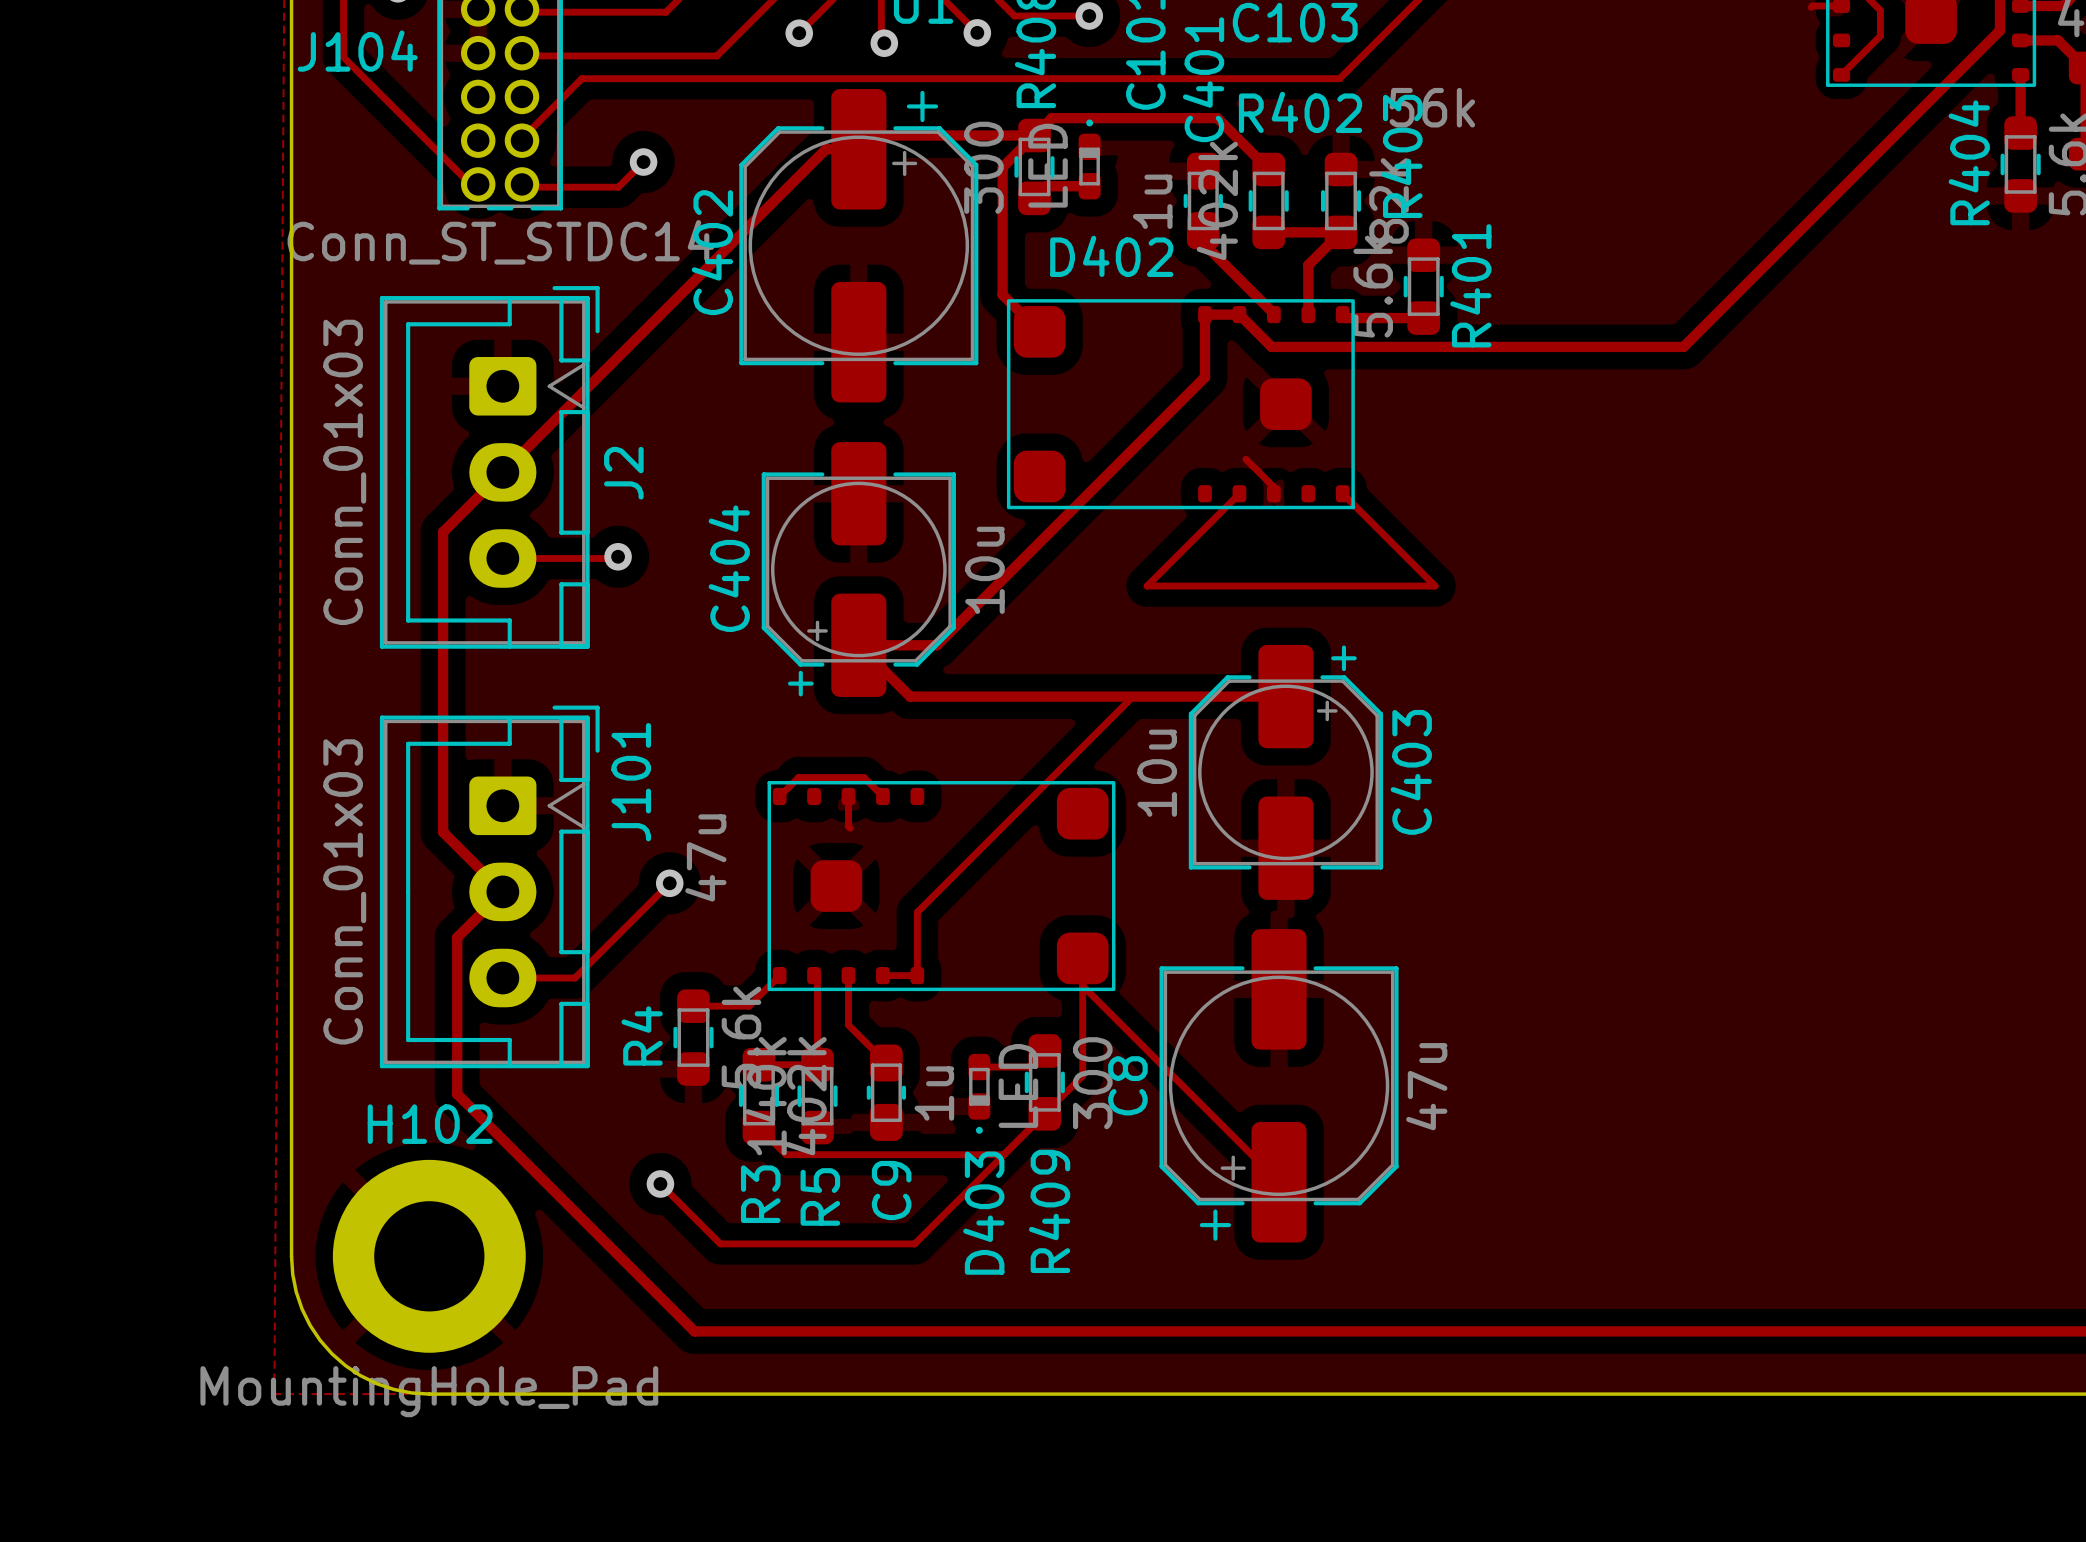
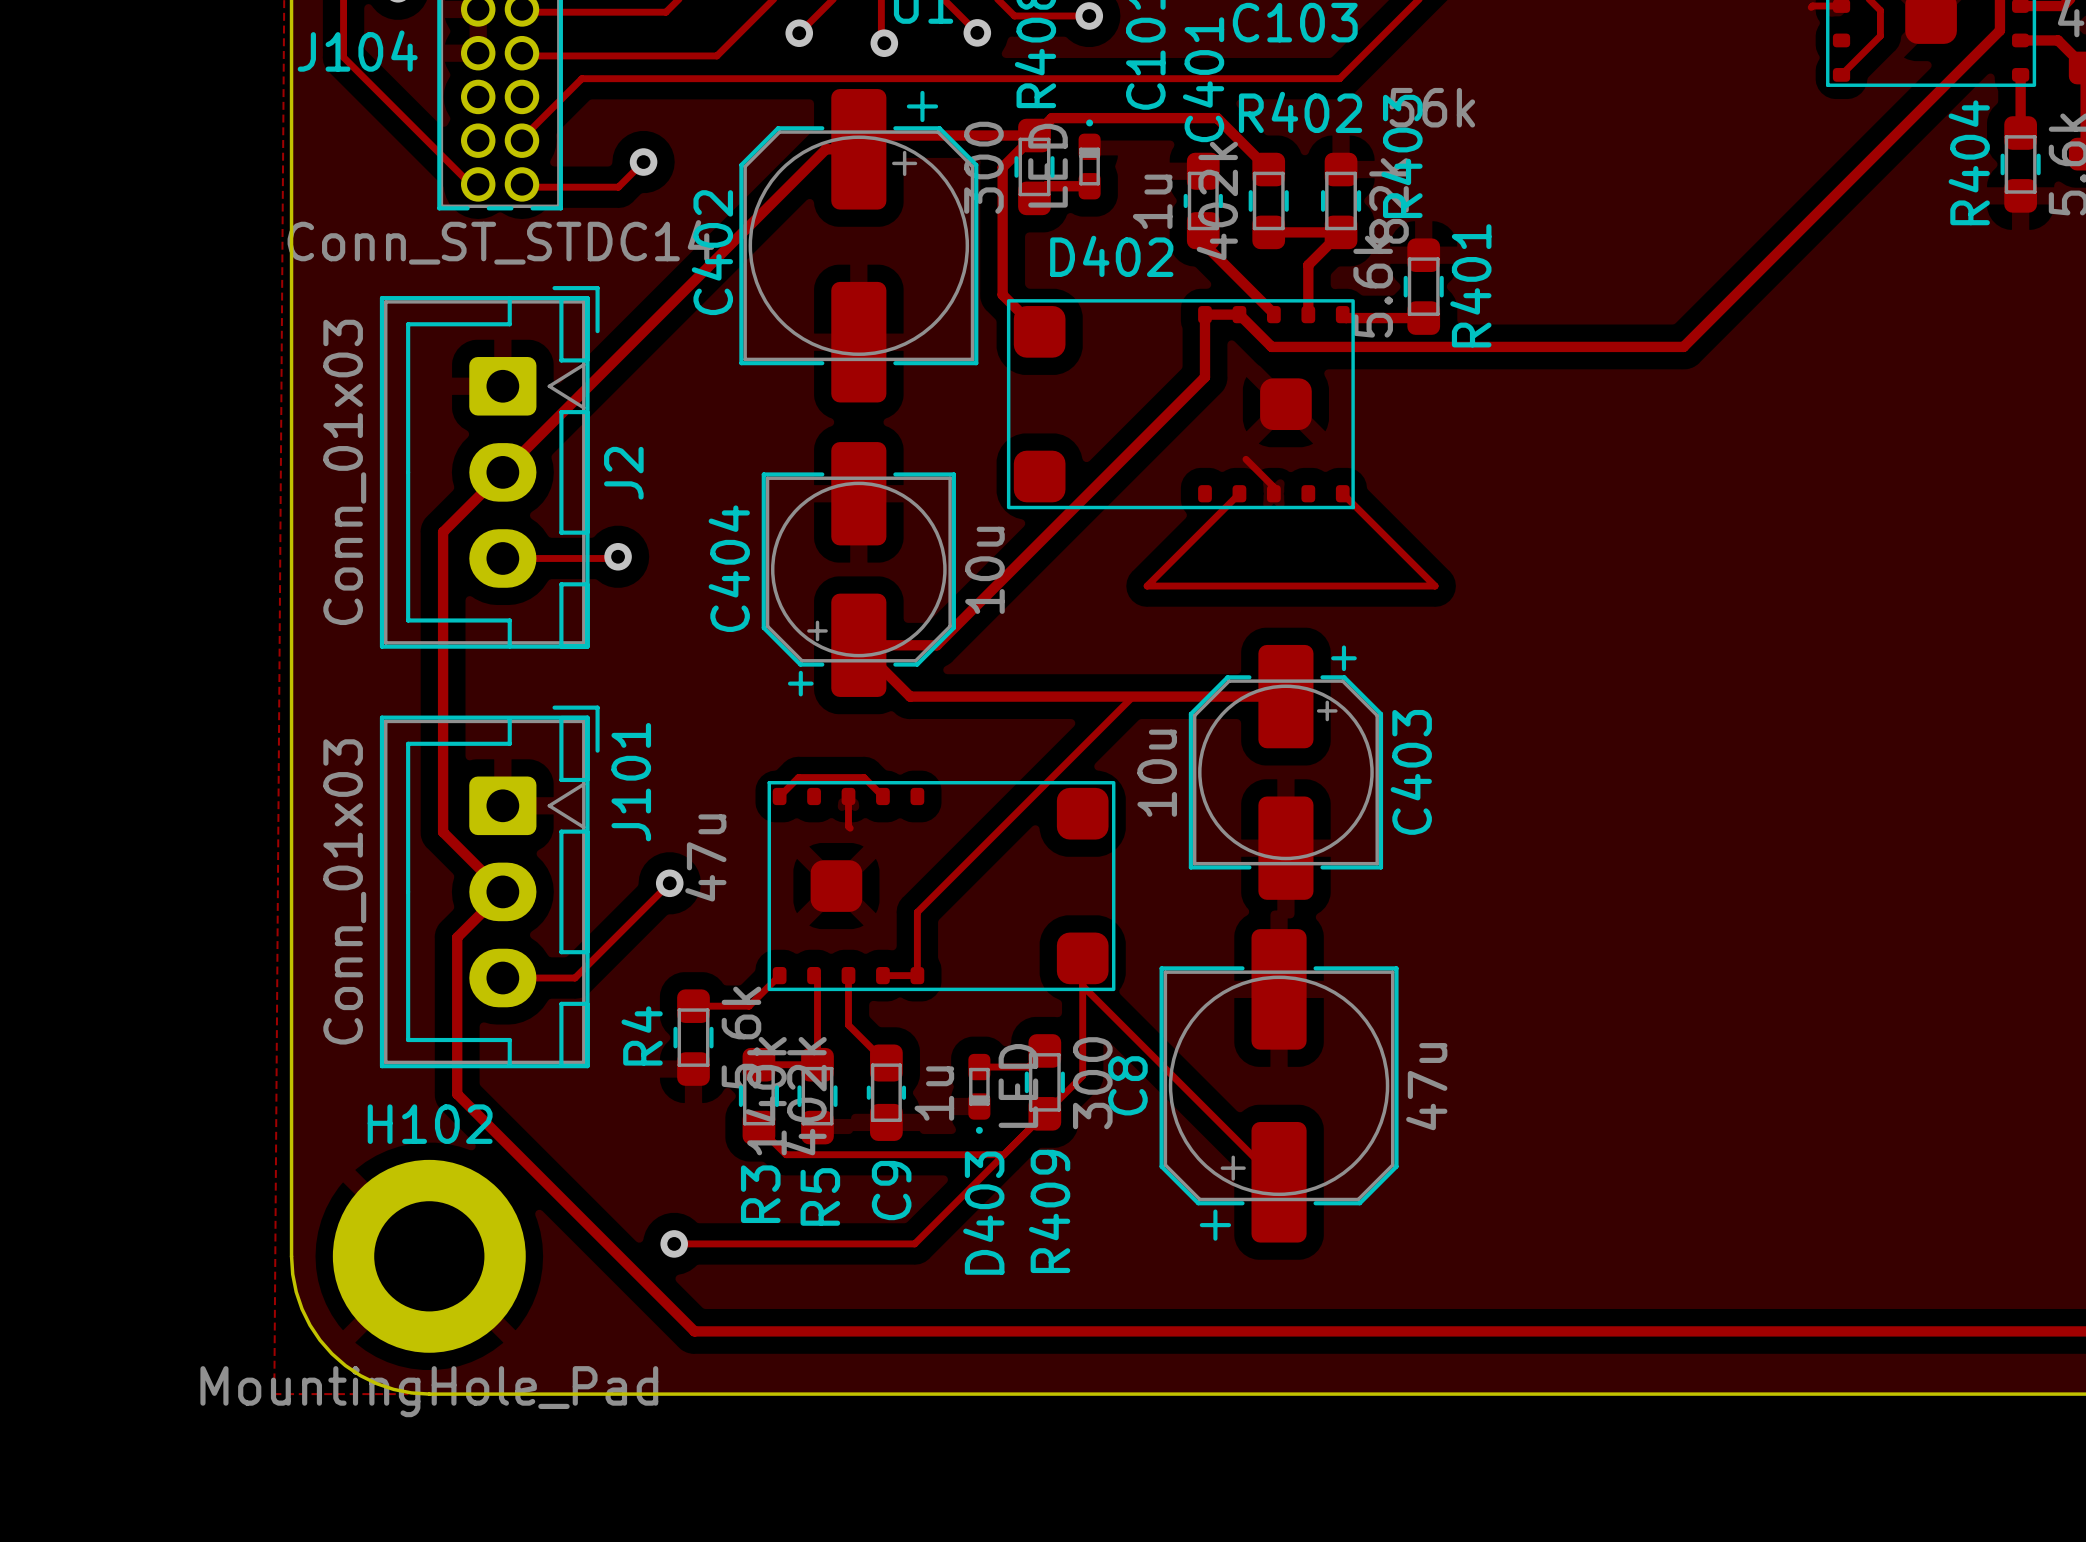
track: (660, 1183) (720, 1243) -> (674, 1243) (720, 1243)
via position: (660, 1183) -> (674, 1243)

